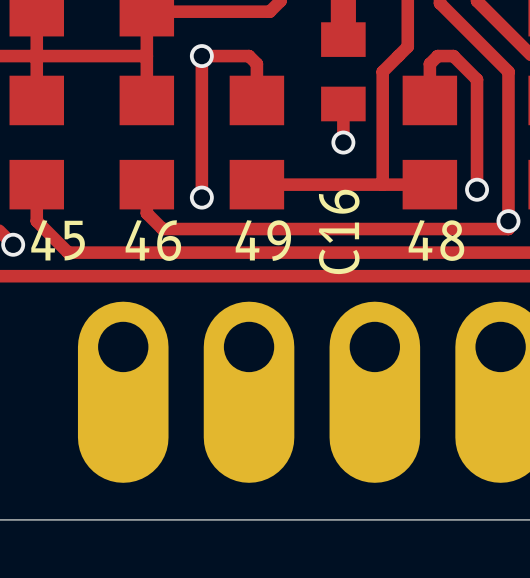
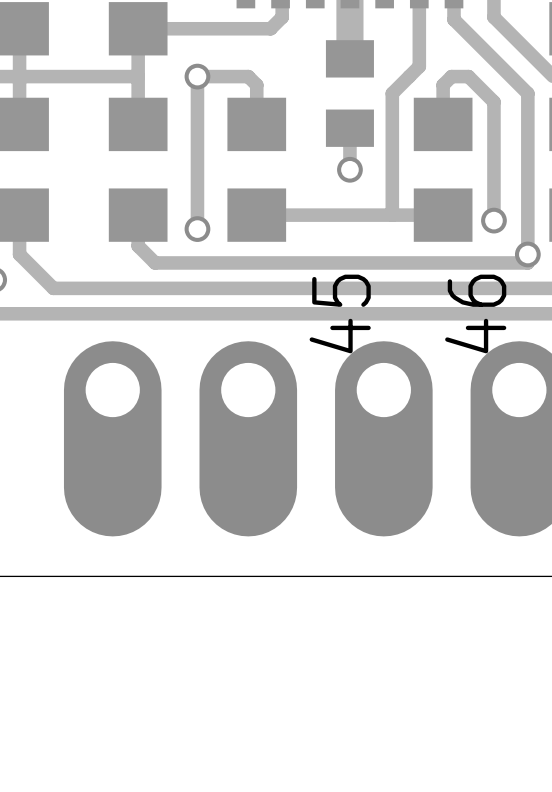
C16 name: C16 (339, 231) -> none
45 name: 45 (58, 240) -> none
46 name: 46 (153, 240) -> none
49 name: 49 (263, 240) -> none
48 name: 48 (436, 240) -> none
text: none -> 46 (475, 313)
text: none -> 45 (340, 313)

